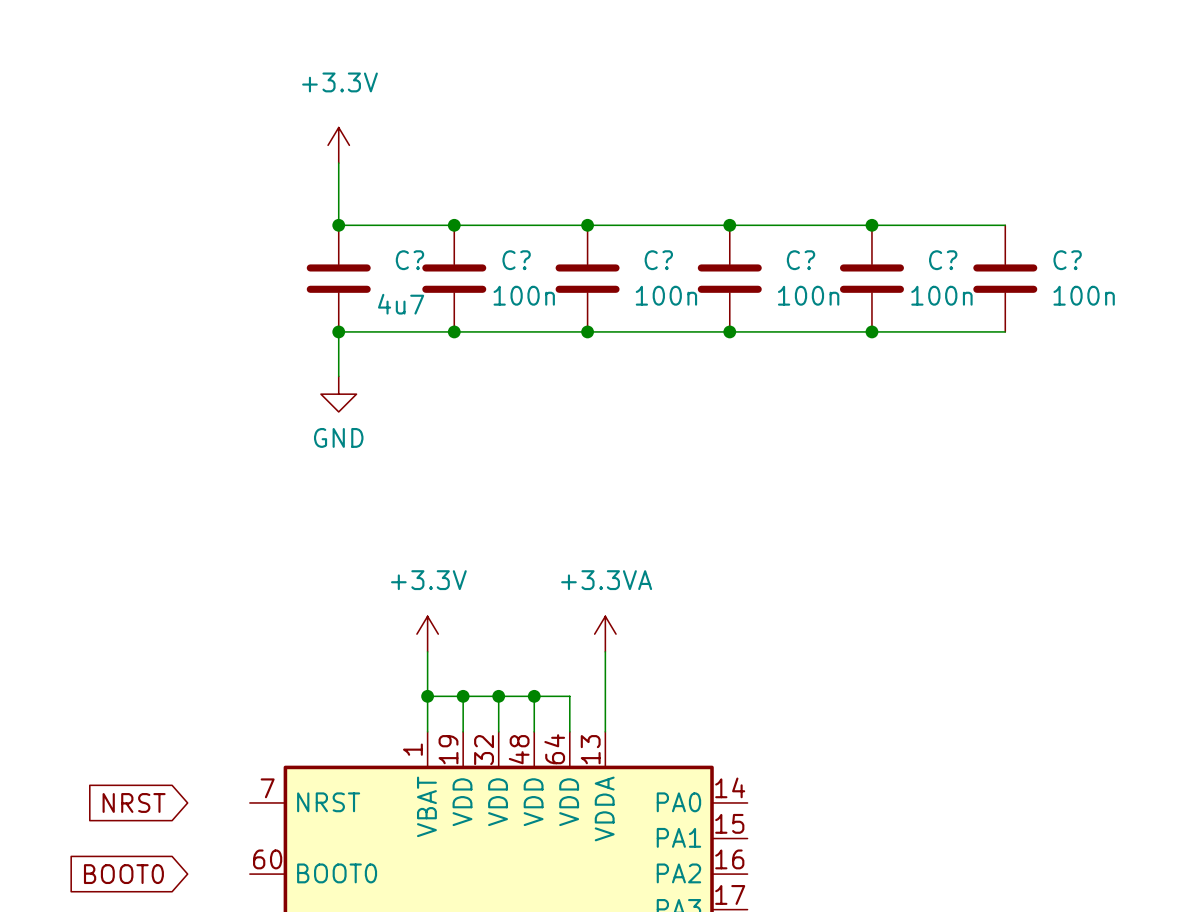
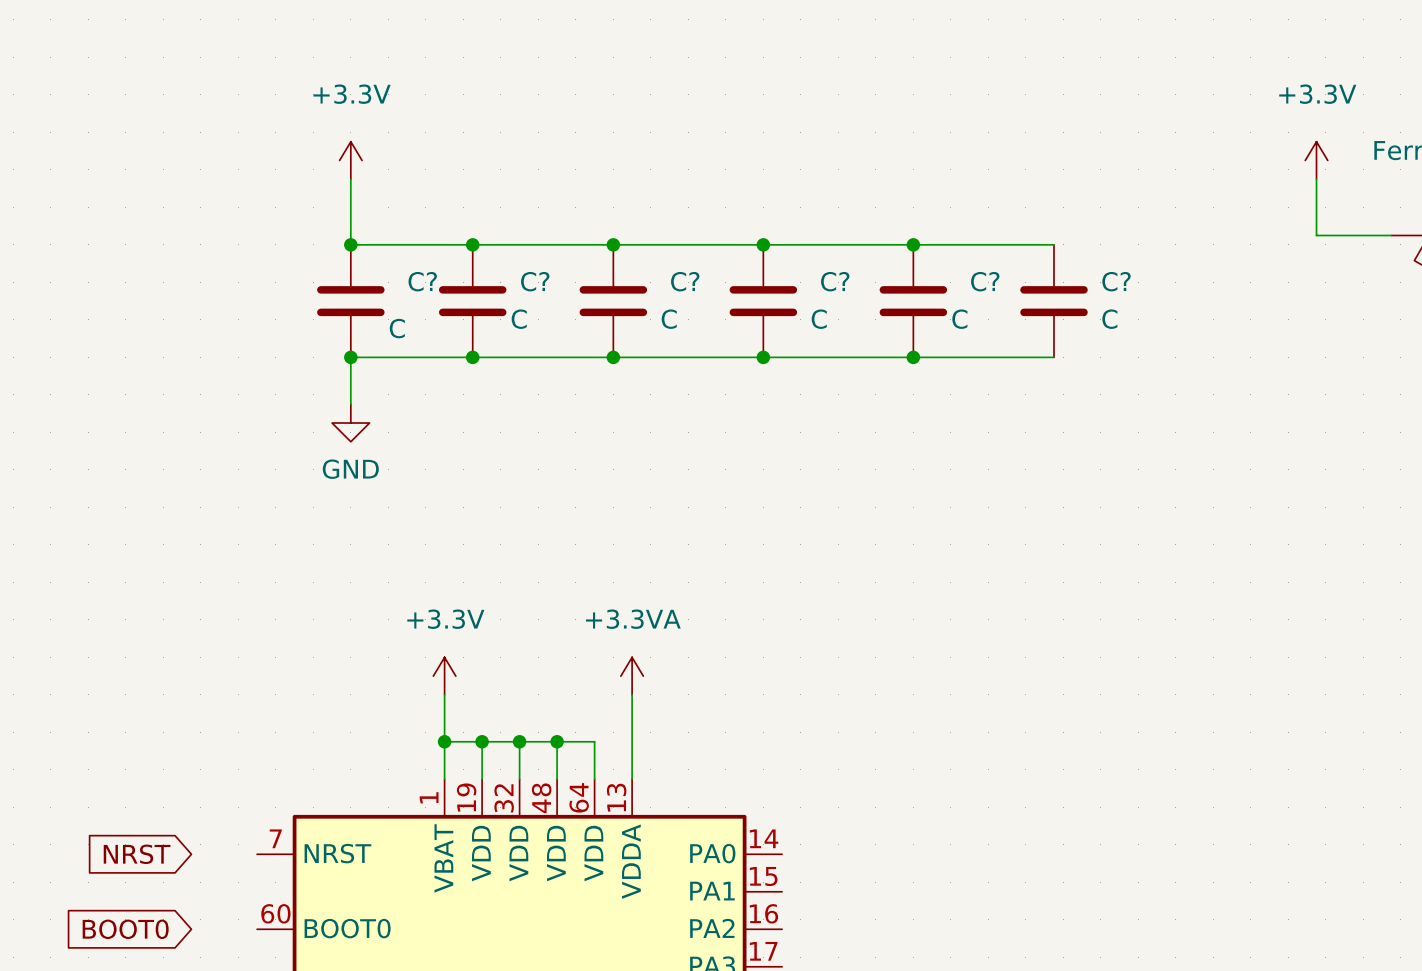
C? value: 100n (524, 295) -> C (519, 319)
C? value: 100n (666, 295) -> C (669, 319)
C? value: 100n (808, 295) -> C (819, 319)
C? value: 100n (941, 295) -> C (959, 319)
C? value: 100n (1084, 295) -> C (1109, 319)
C? value: 4u7 (401, 304) -> C (397, 328)

